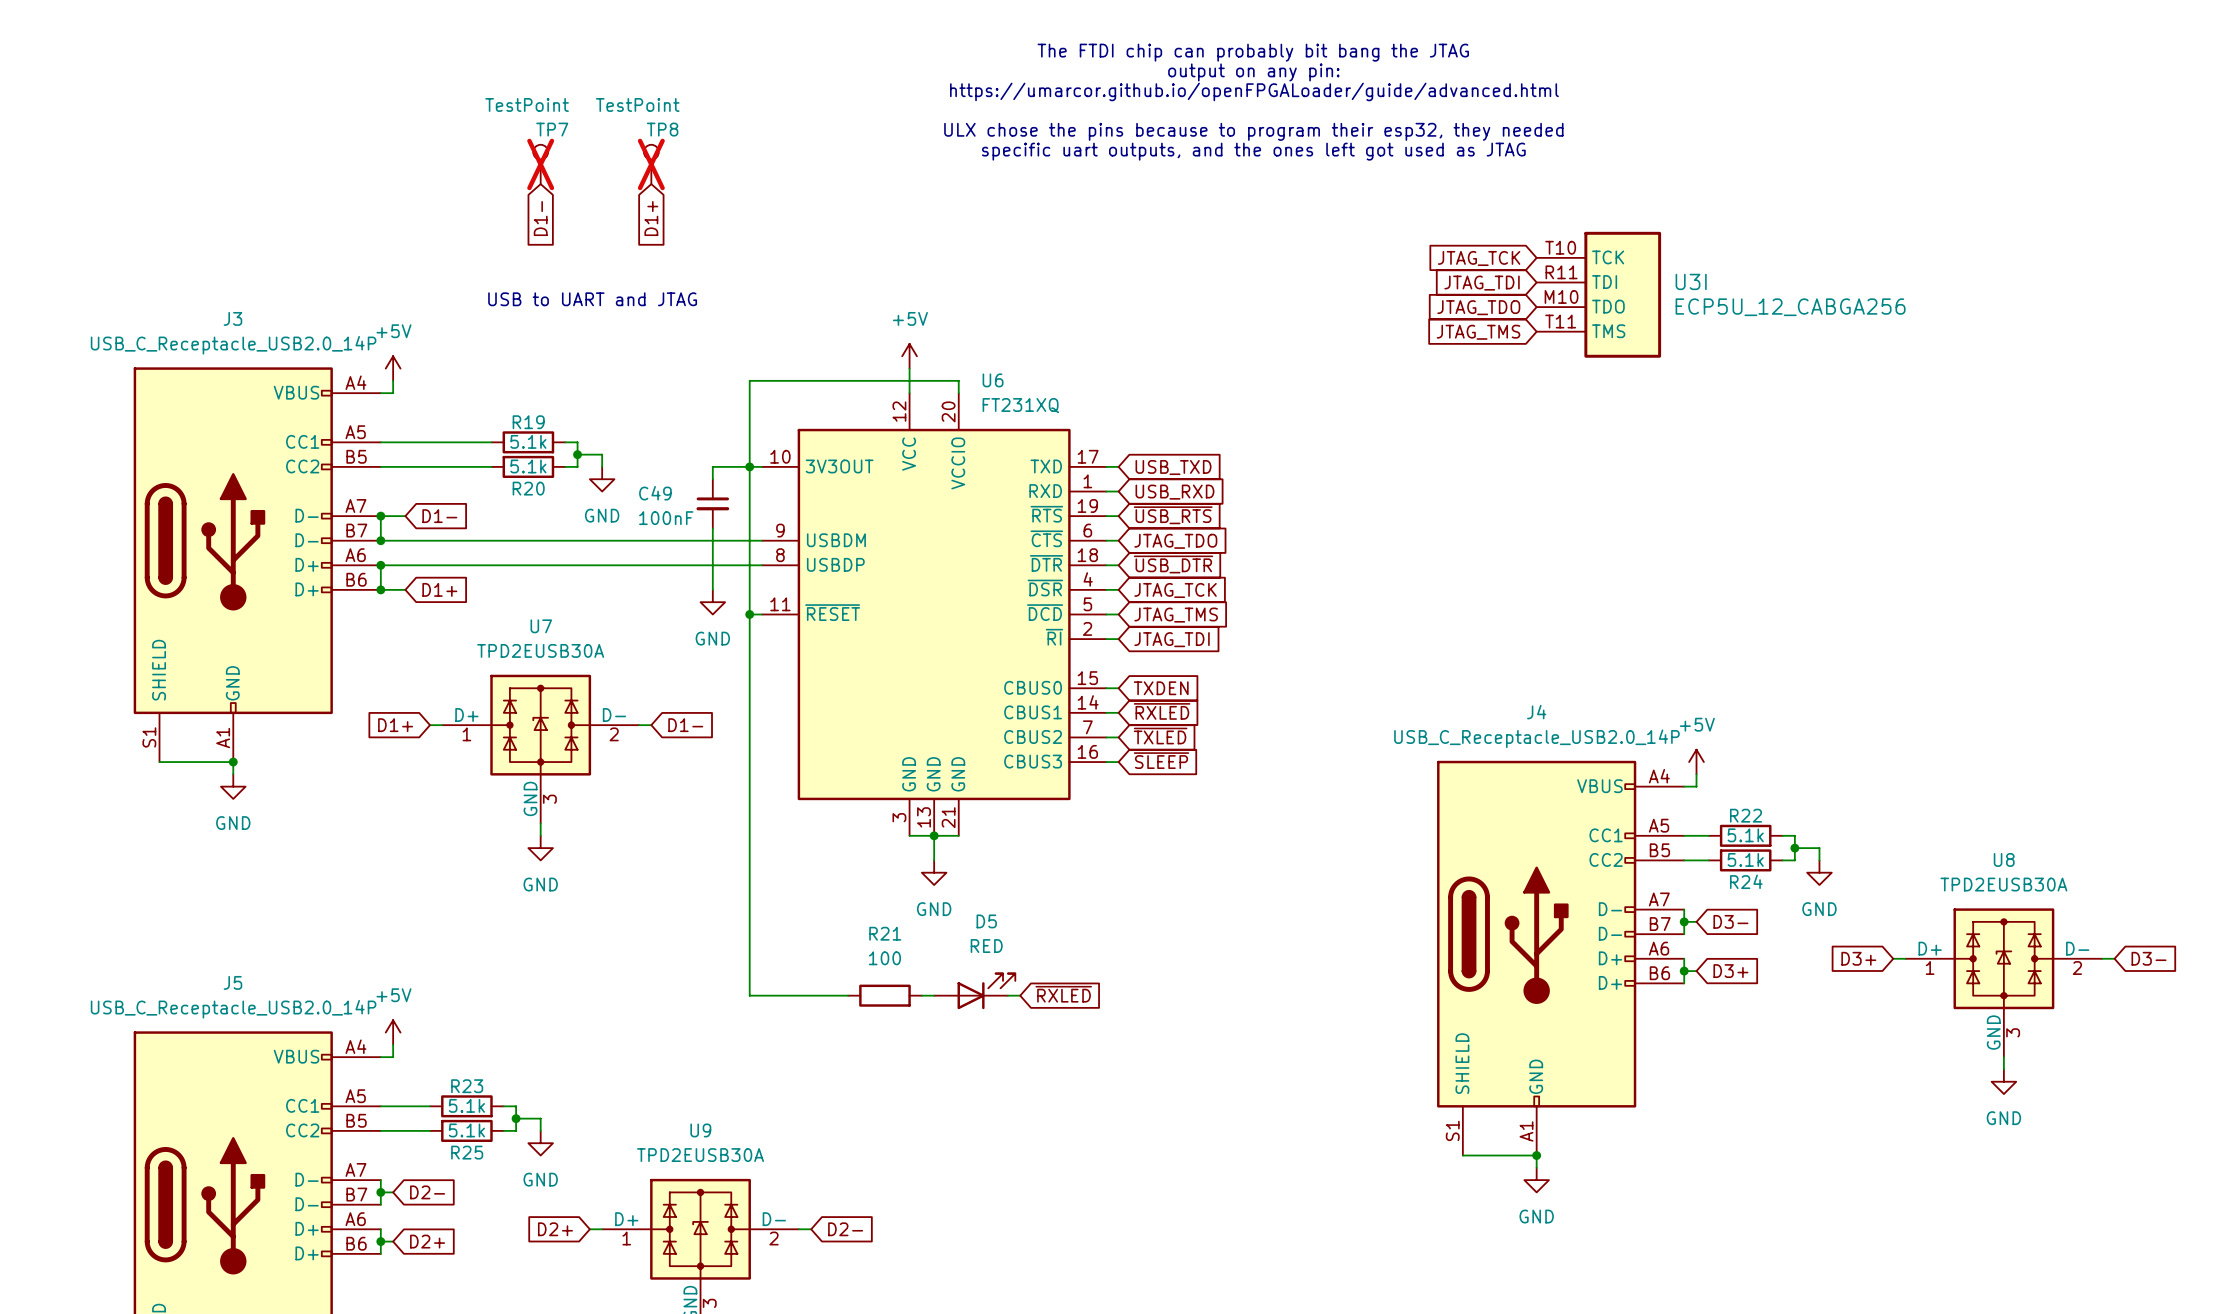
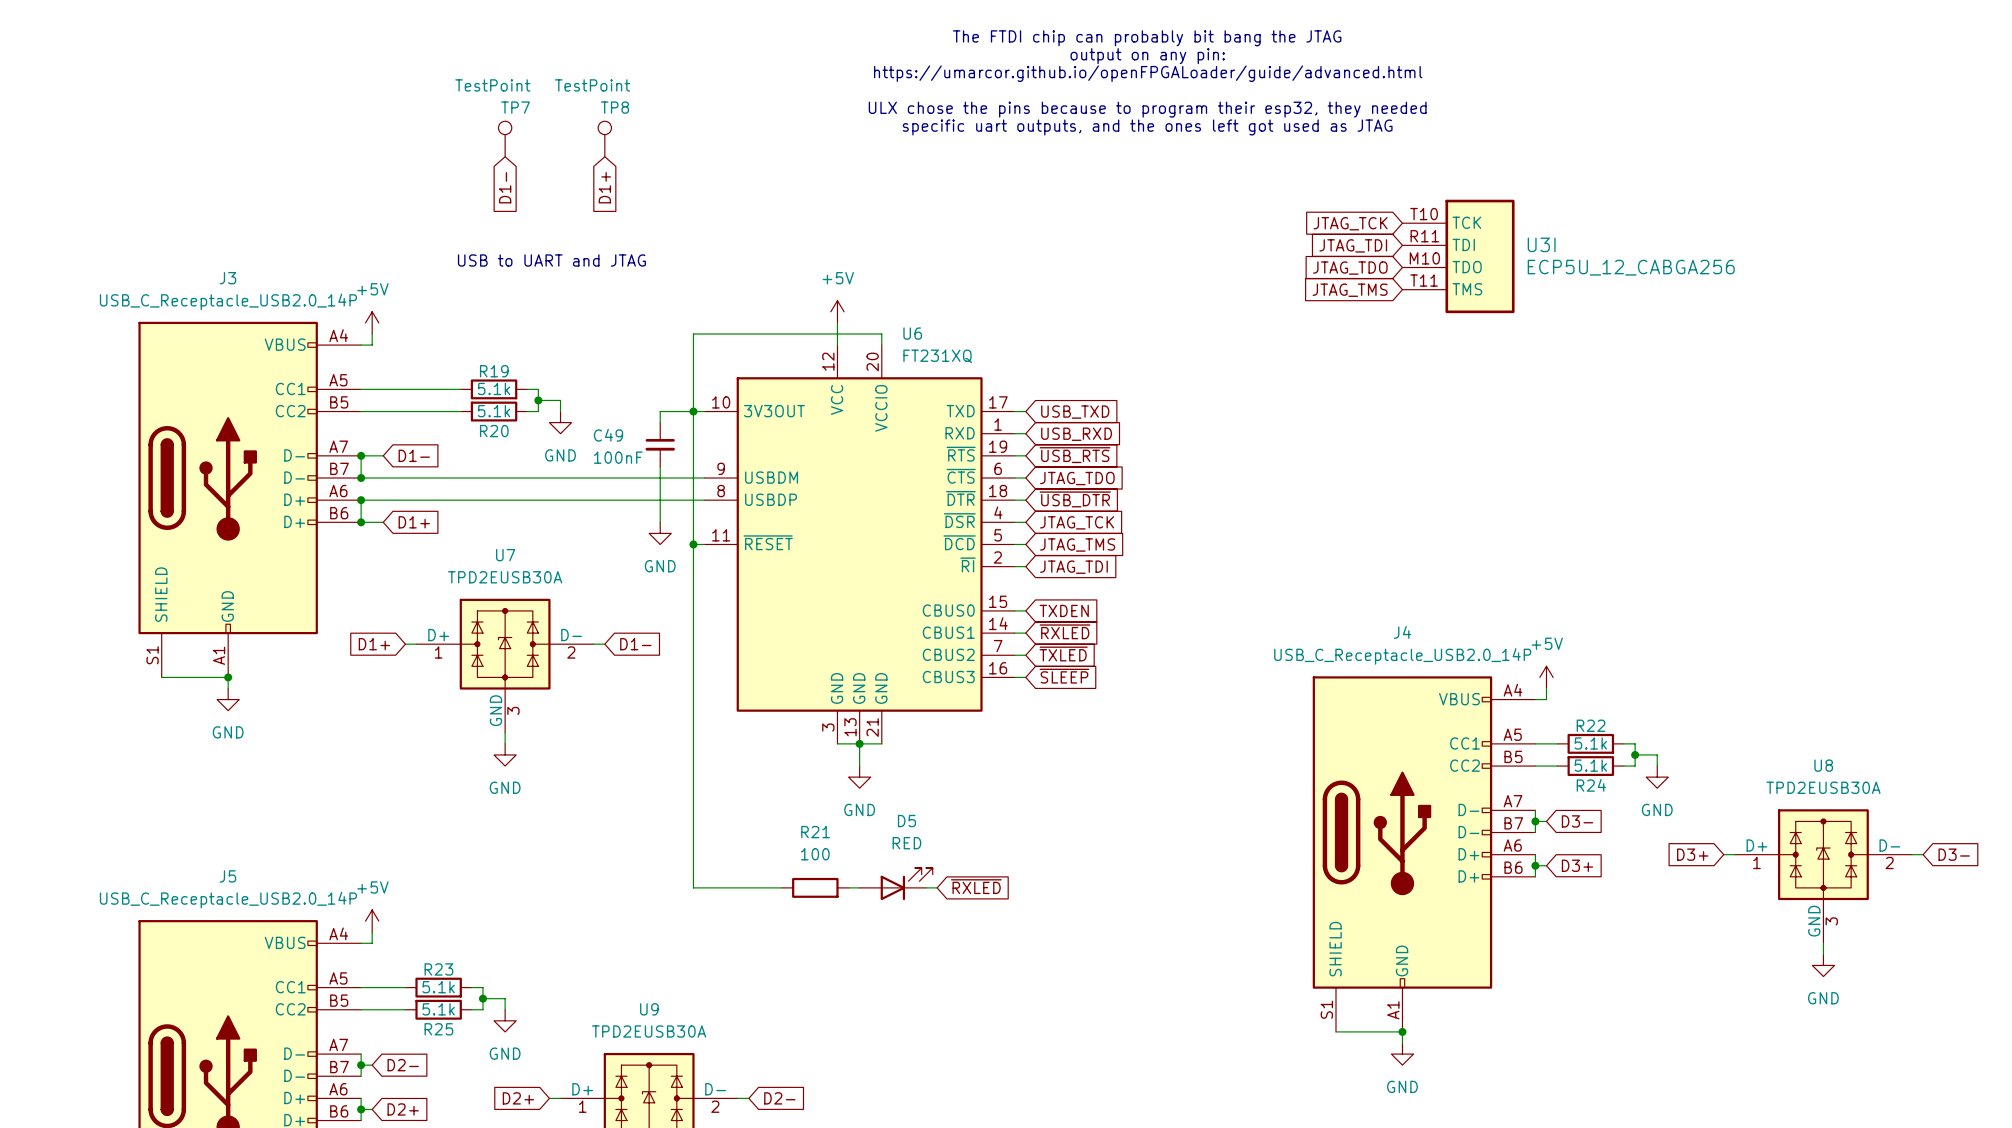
TP7 do-not-place cross: (540, 164) -> none
TP8 do-not-place cross: (651, 164) -> none

